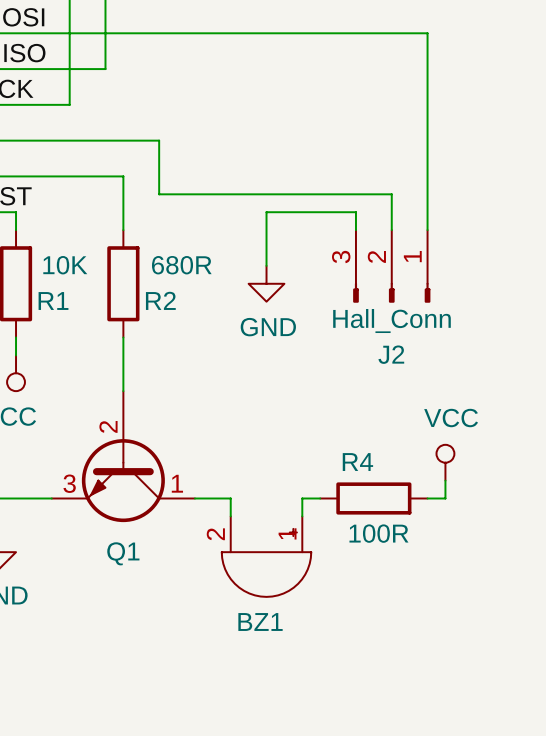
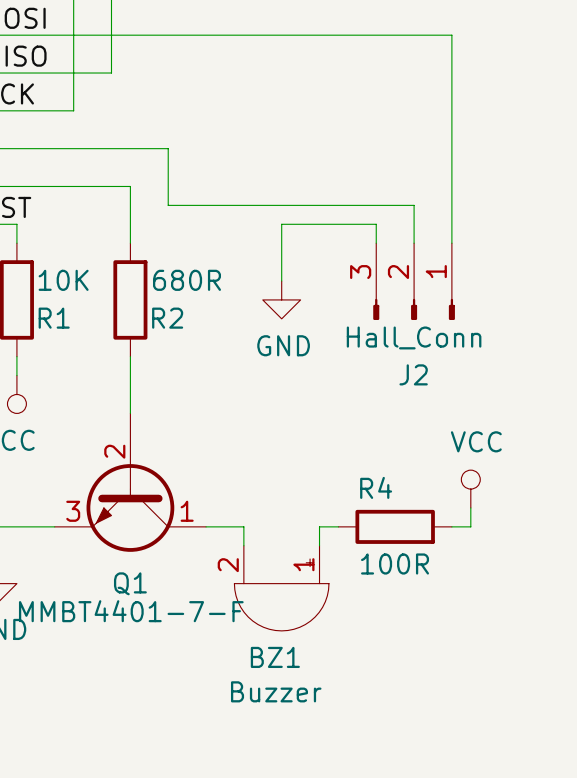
Q1 value: none -> MMBT4401-7-F (131, 611)
BZ1 value: none -> Buzzer (276, 691)

